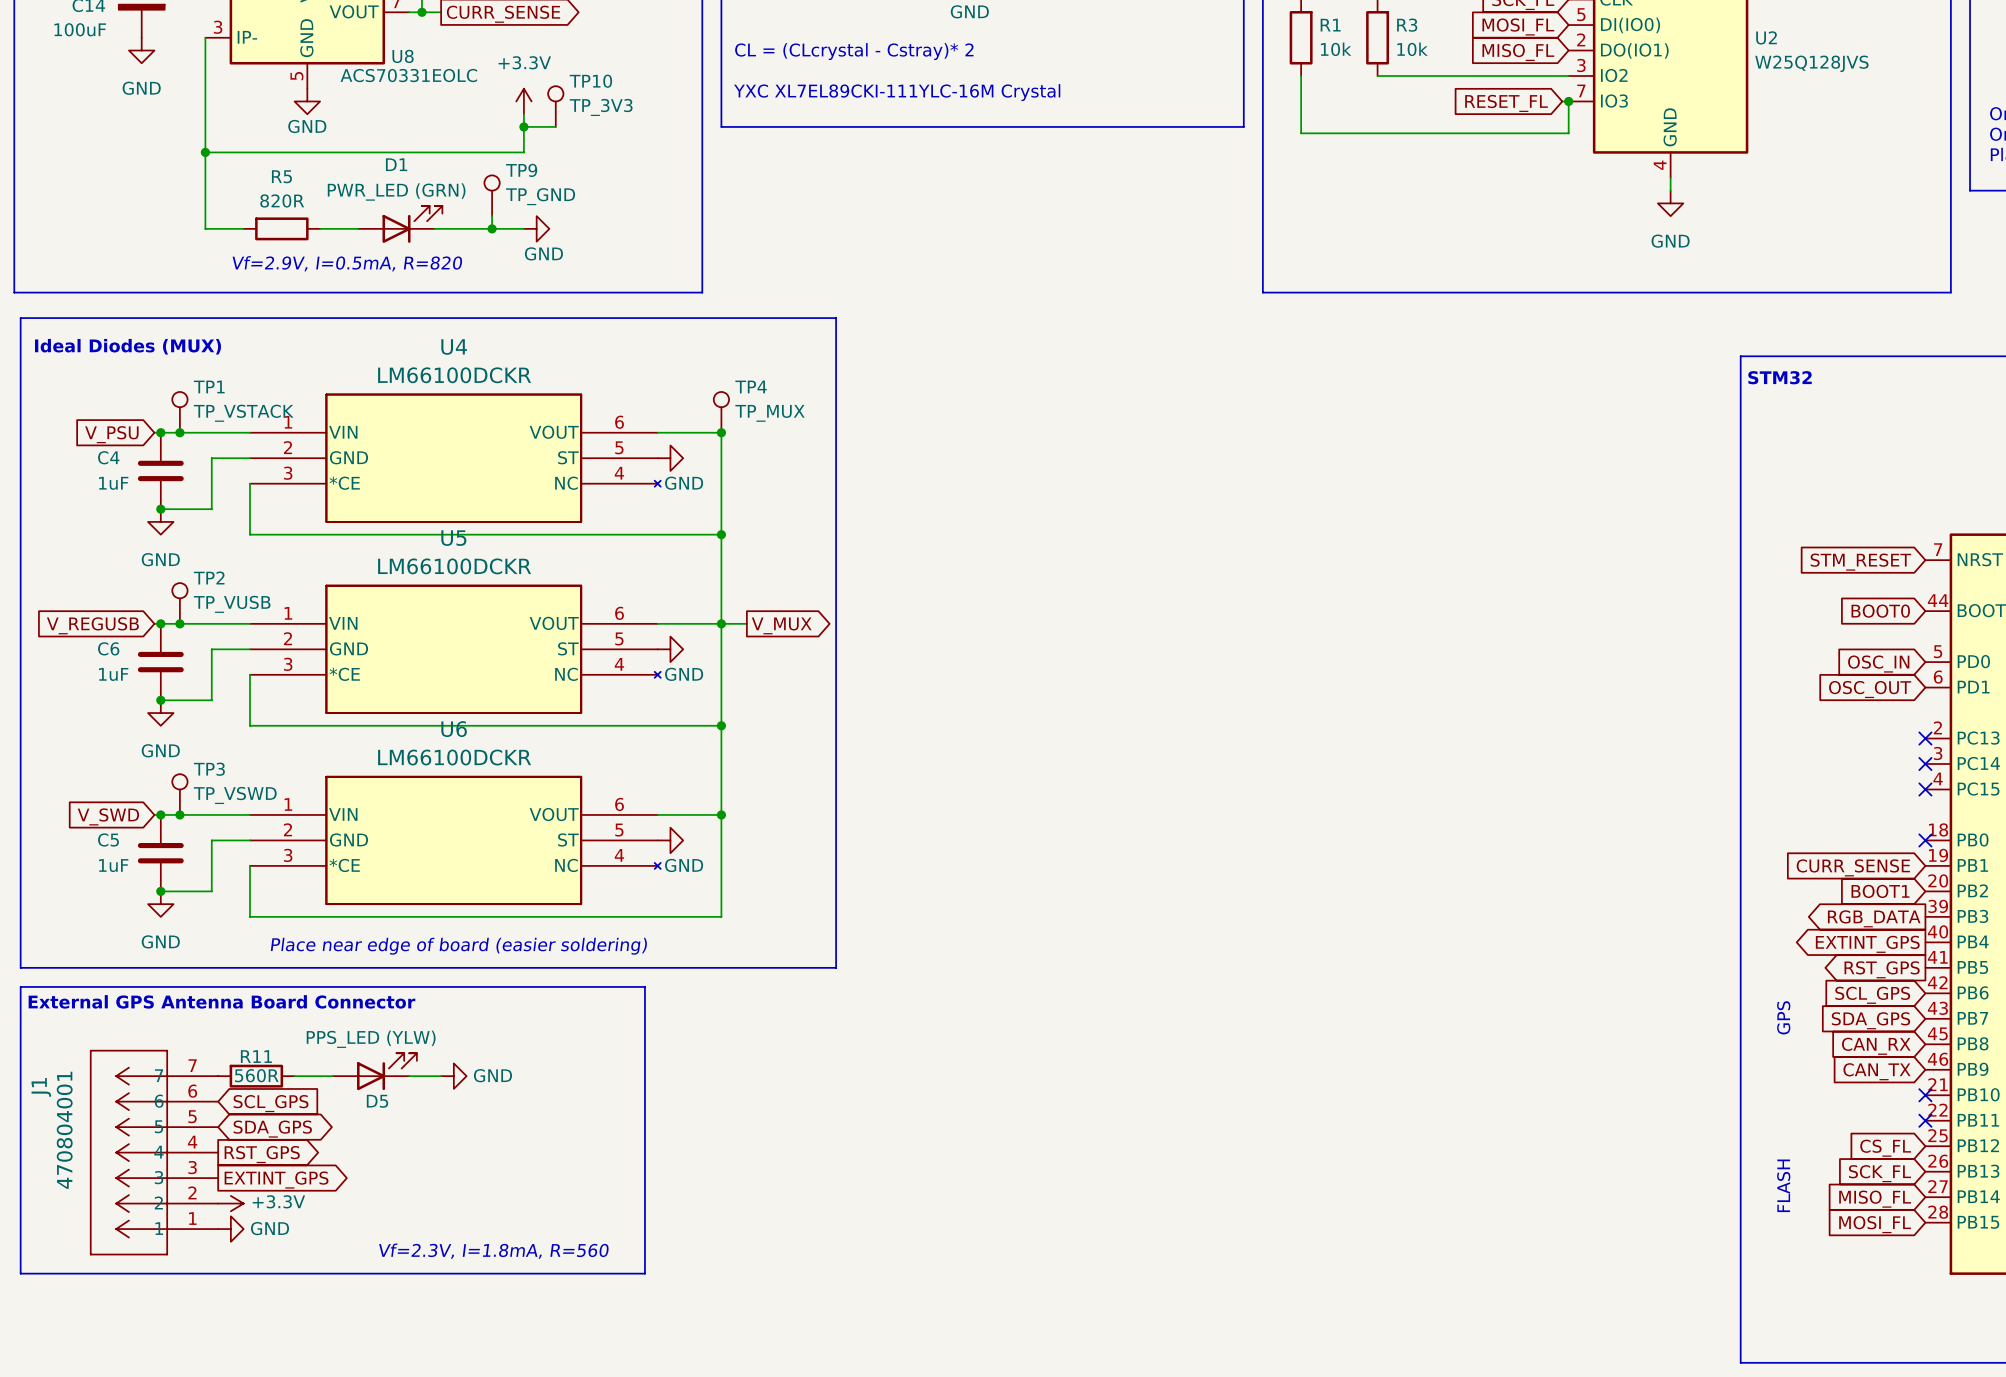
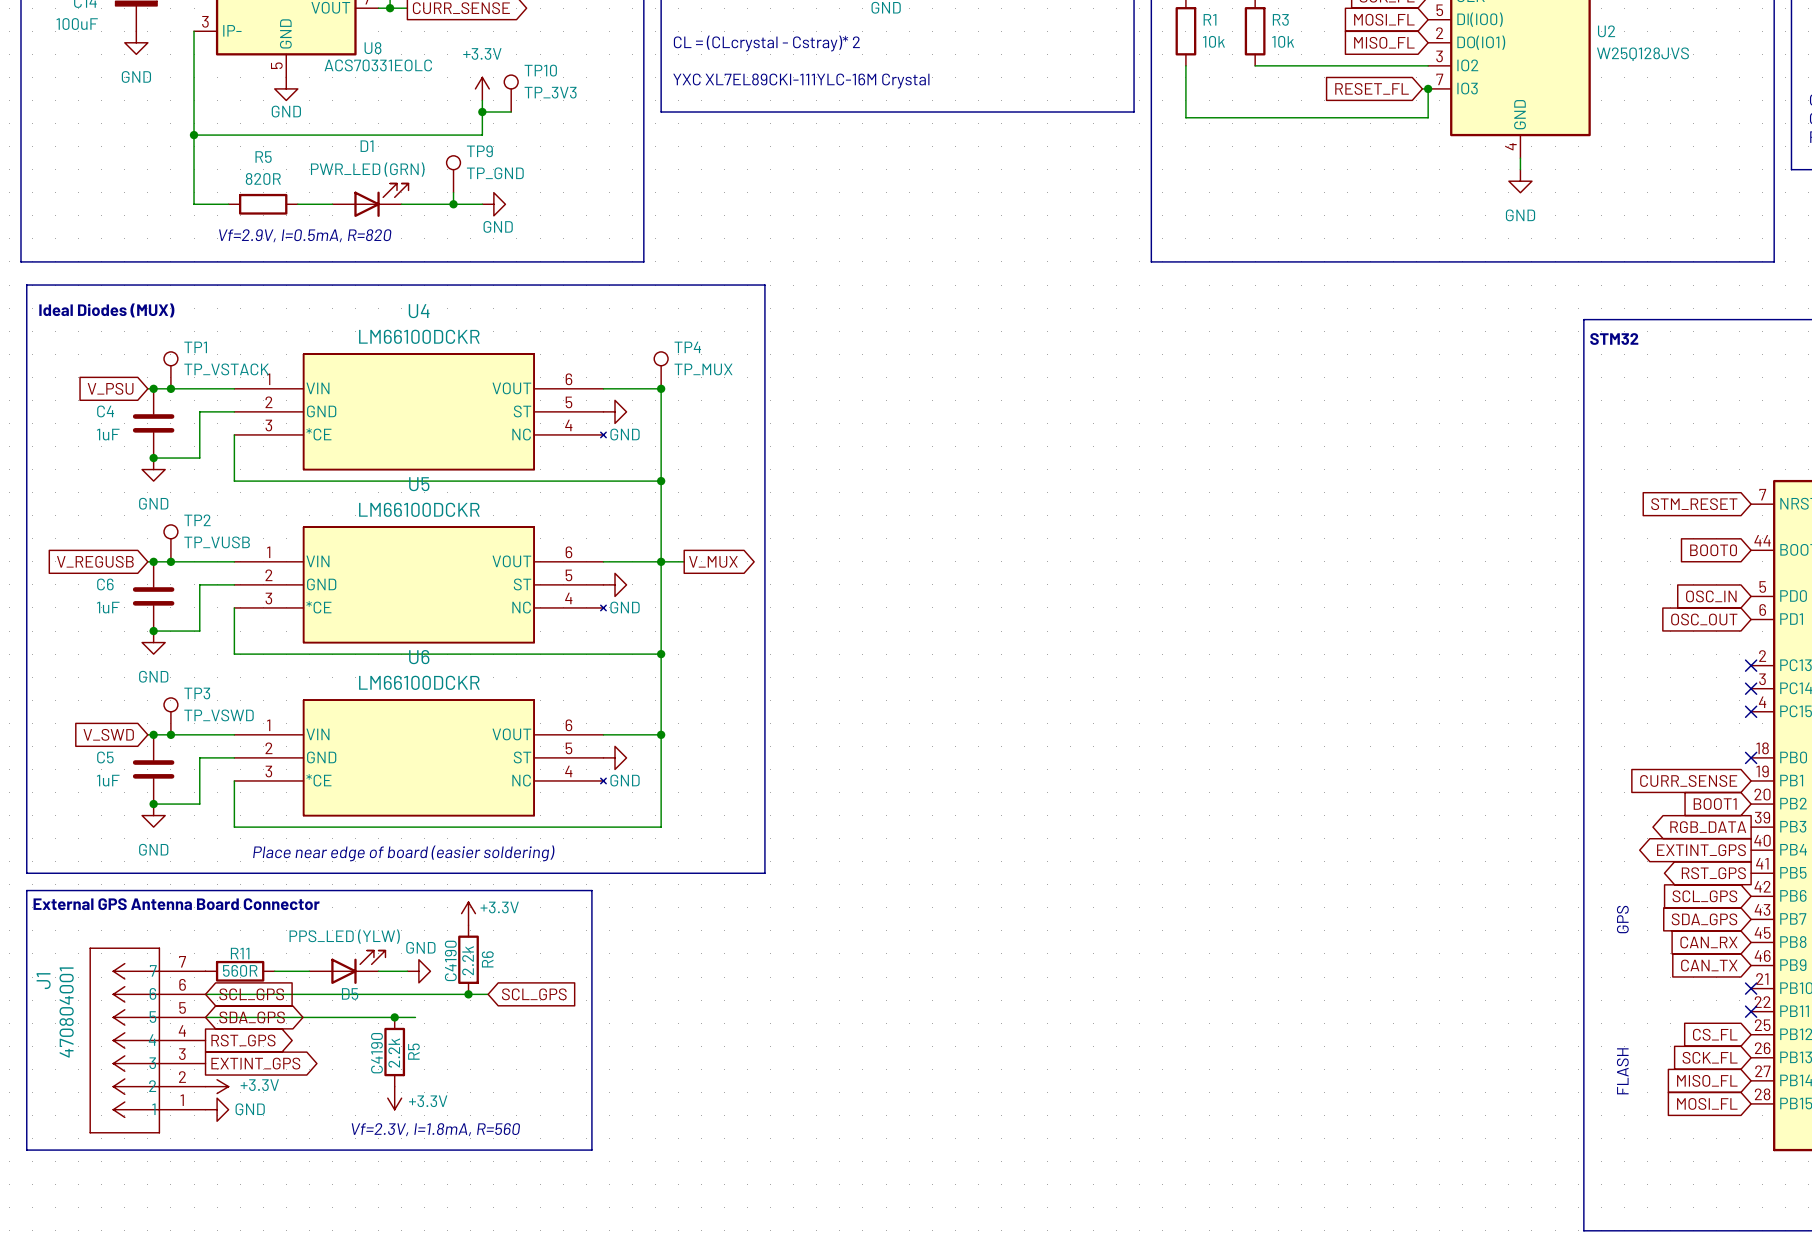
power symbol: none -> +3.3V (468, 913)
R6: none -> 2.2k (468, 959)
power symbol text position: GND (492, 1075) -> GND (420, 947)
wire: none -> (205, 994) (488, 994)
junction: none -> (468, 994)
global label: none -> SCL_GPS (534, 994)
wire: none -> (205, 1017) (415, 1017)
junction: none -> (394, 1017)
R5: none -> 2.2k (394, 1052)
power symbol: none -> +3.3V (394, 1098)

